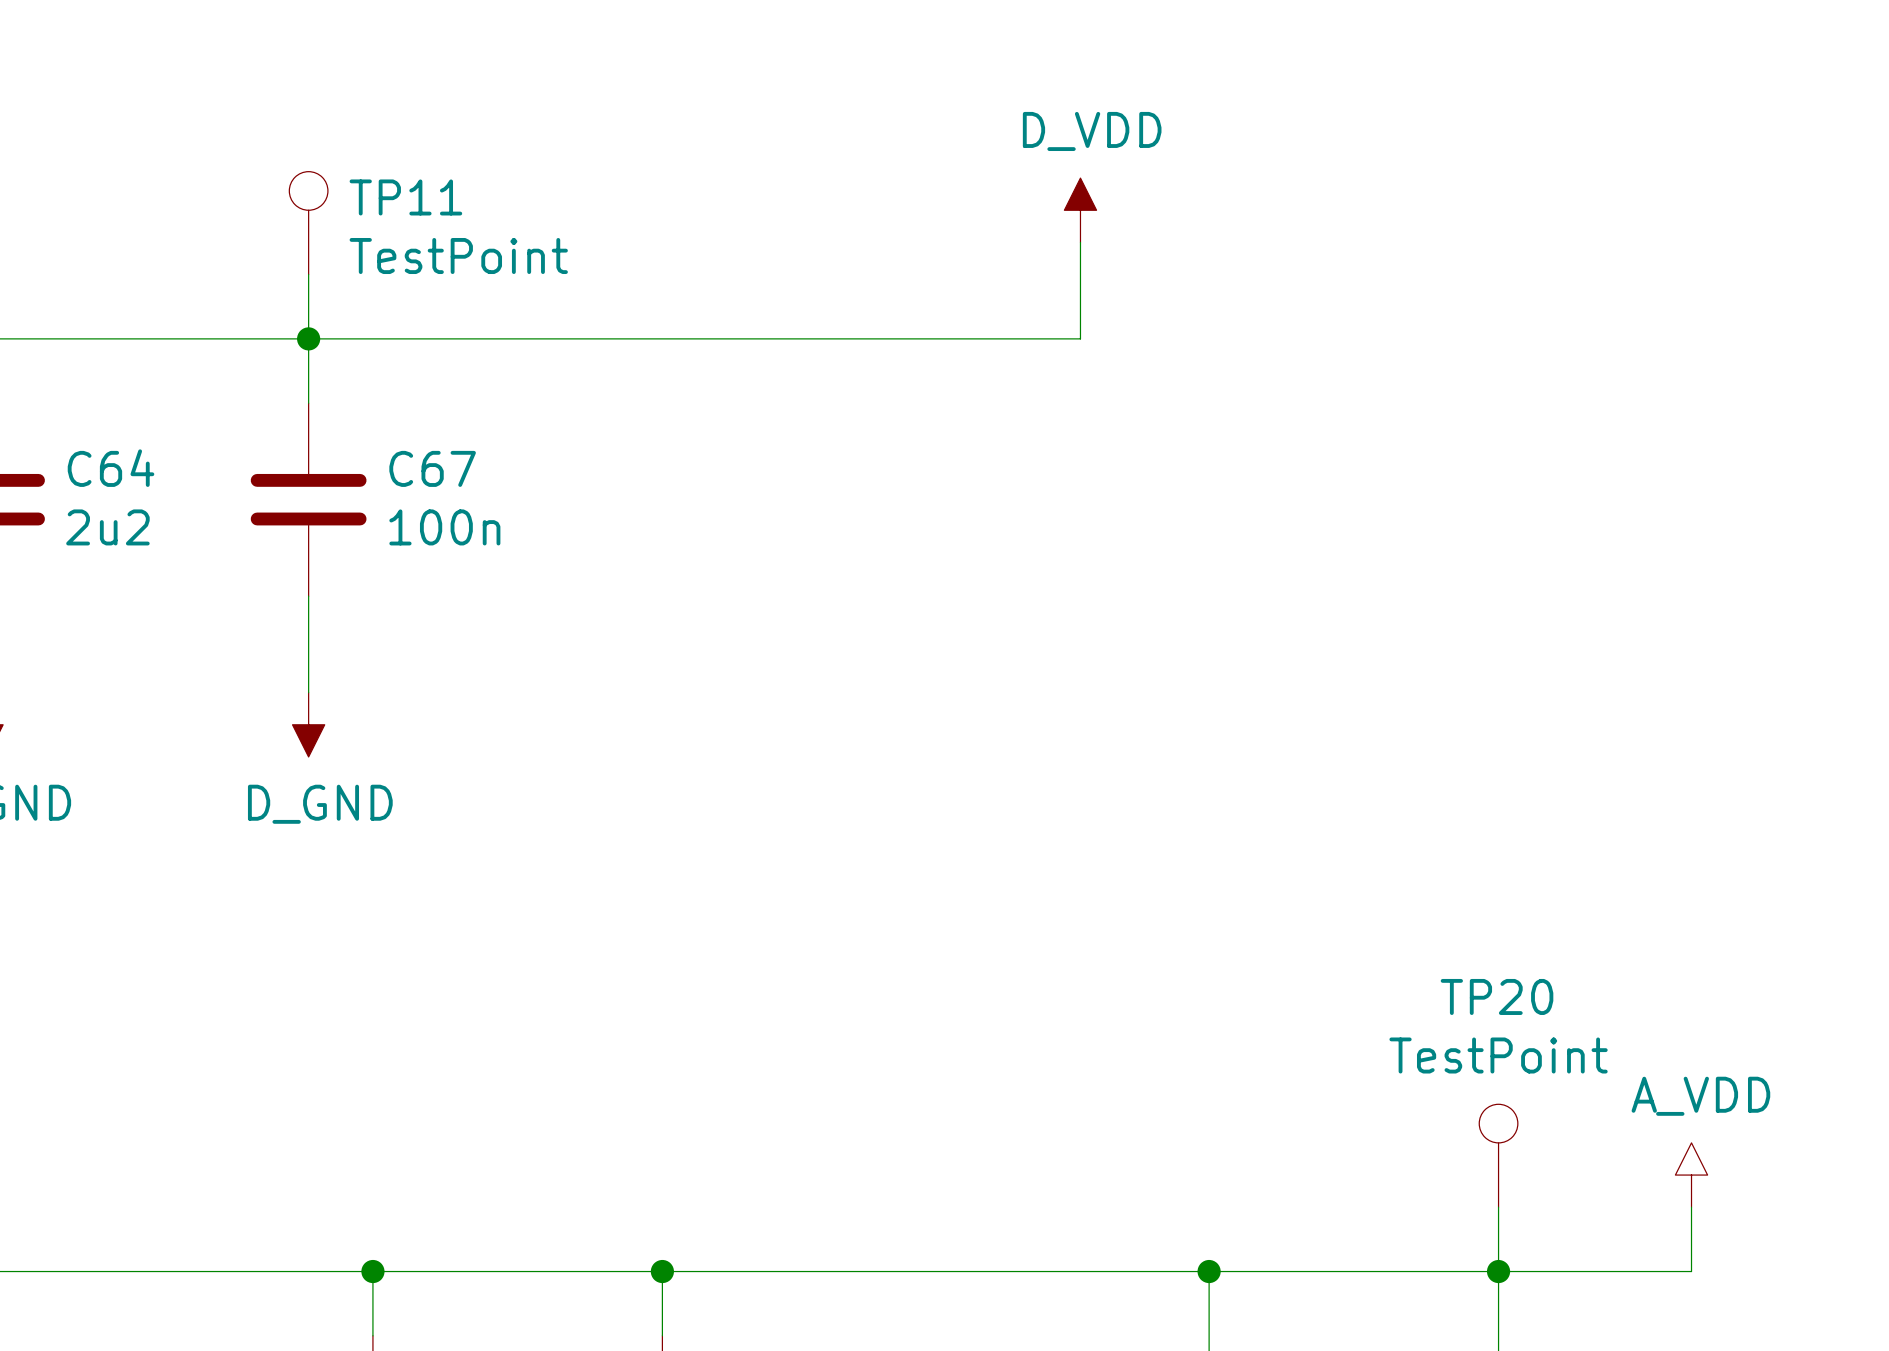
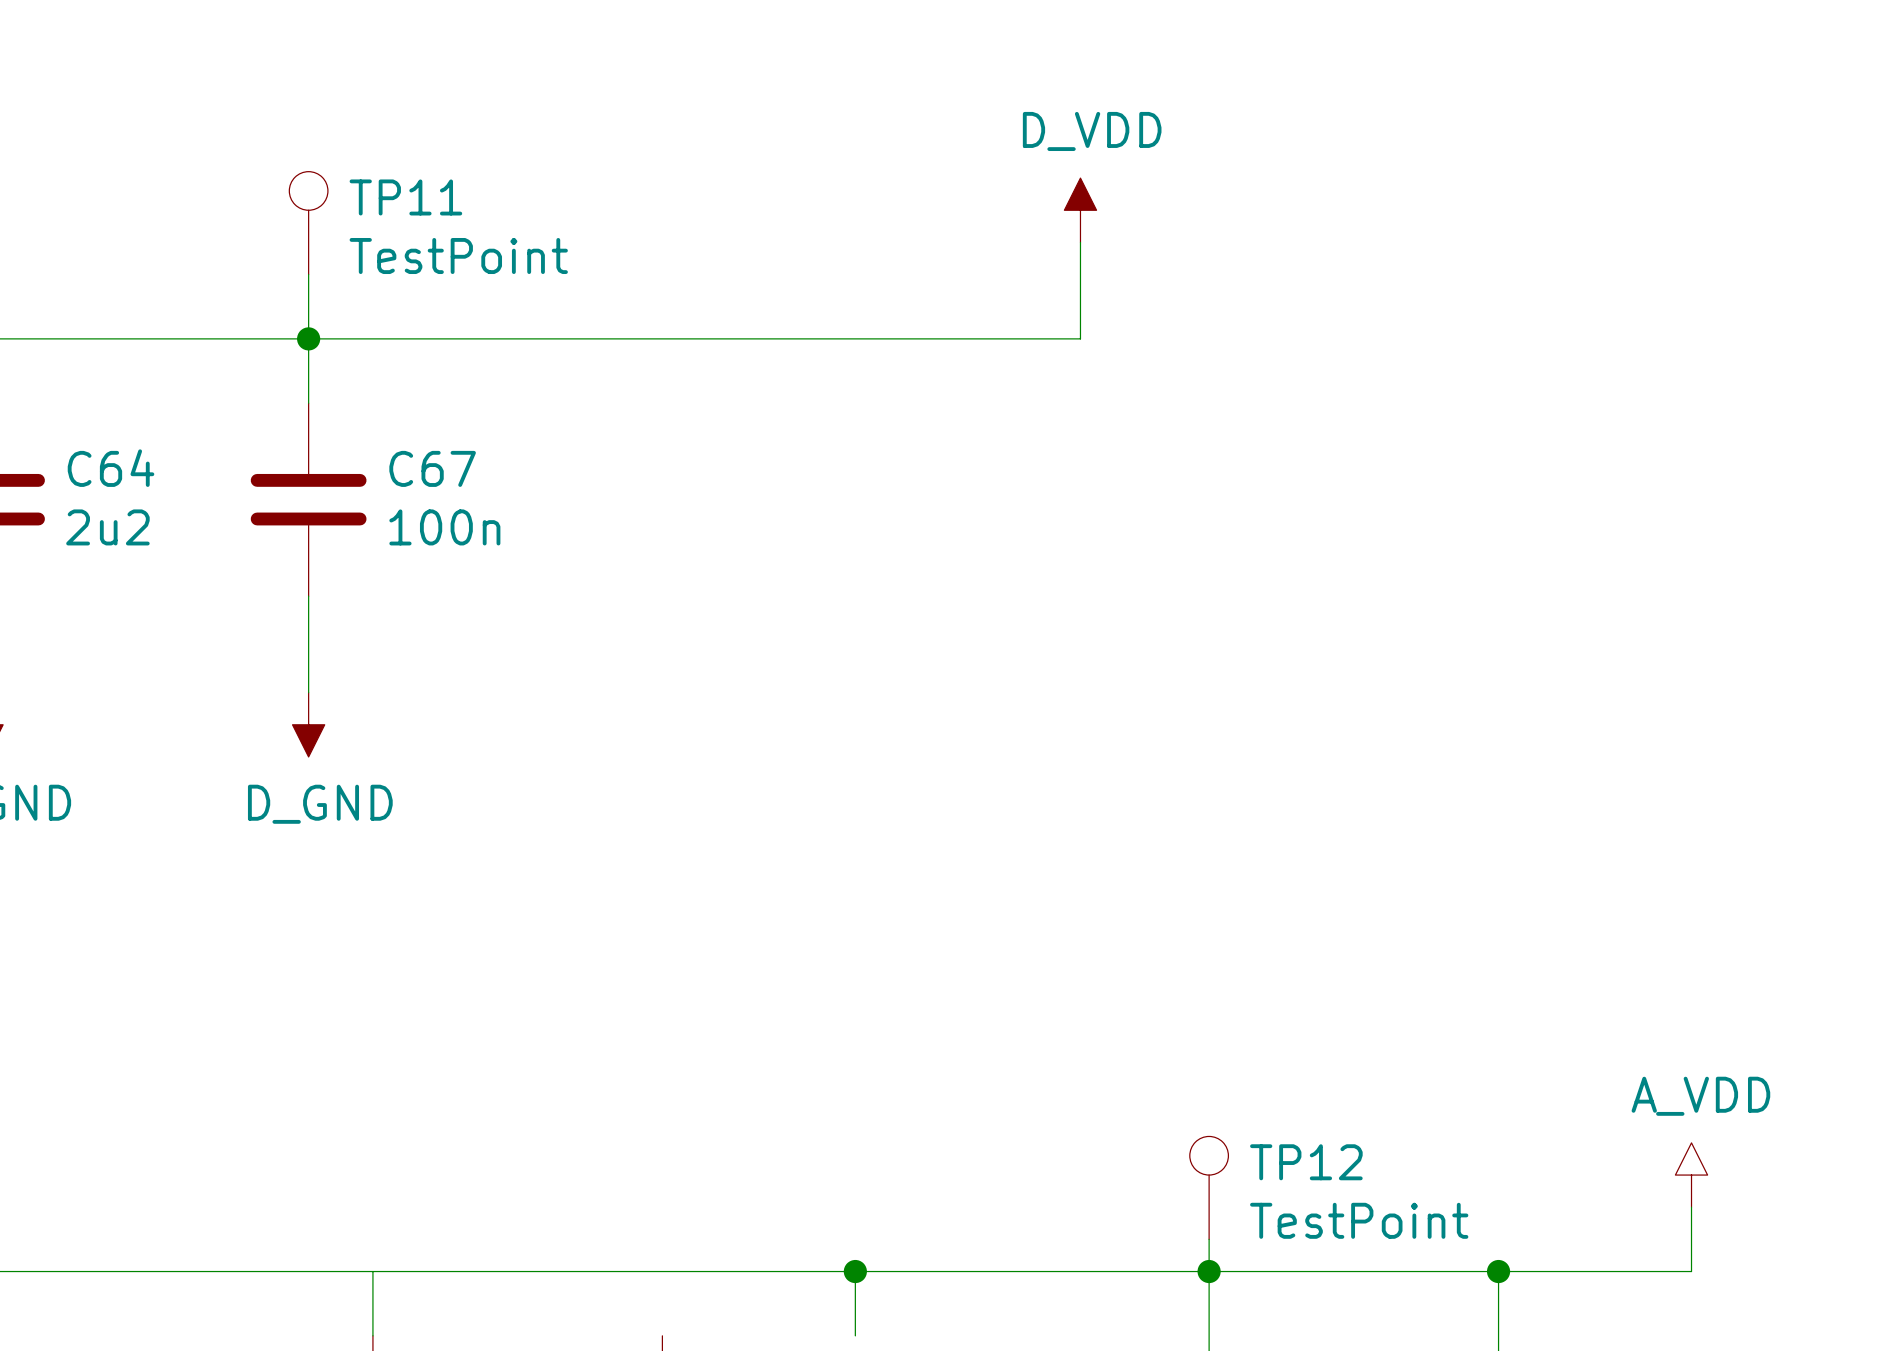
TP20: TestPoint (1498, 1155) -> none
TP12: none -> TestPoint (1209, 1187)
wire: (1498, 1207) (1498, 1271) -> none
wire: none -> (1209, 1239) (1209, 1271)
junction: (372, 1271) -> none
wire: (662, 1271) (662, 1335) -> (855, 1271) (855, 1335)
junction: (662, 1271) -> none
junction: none -> (855, 1271)

